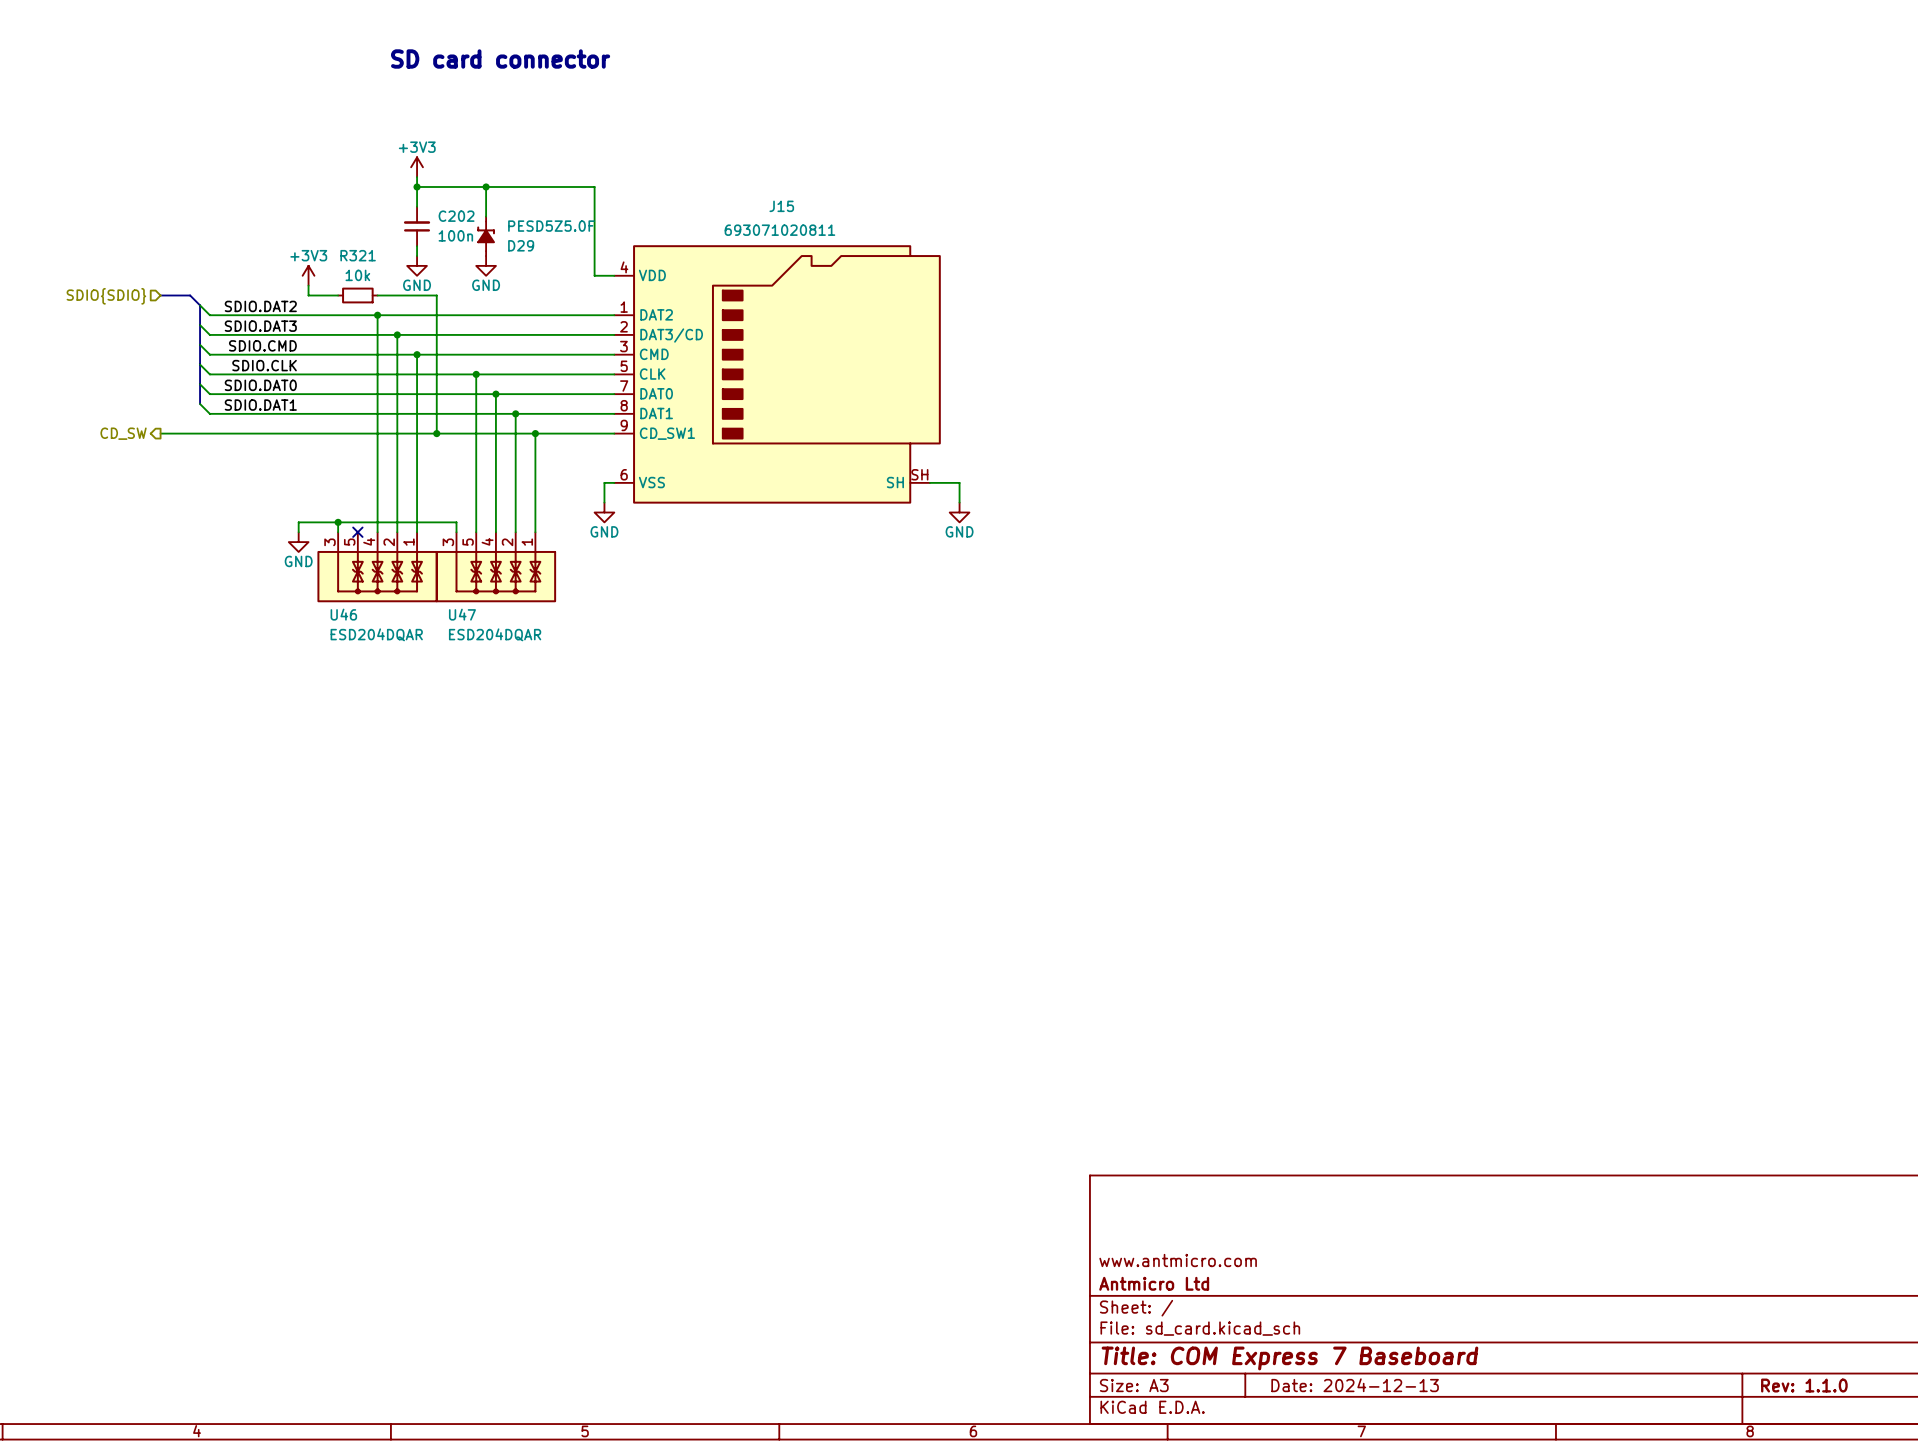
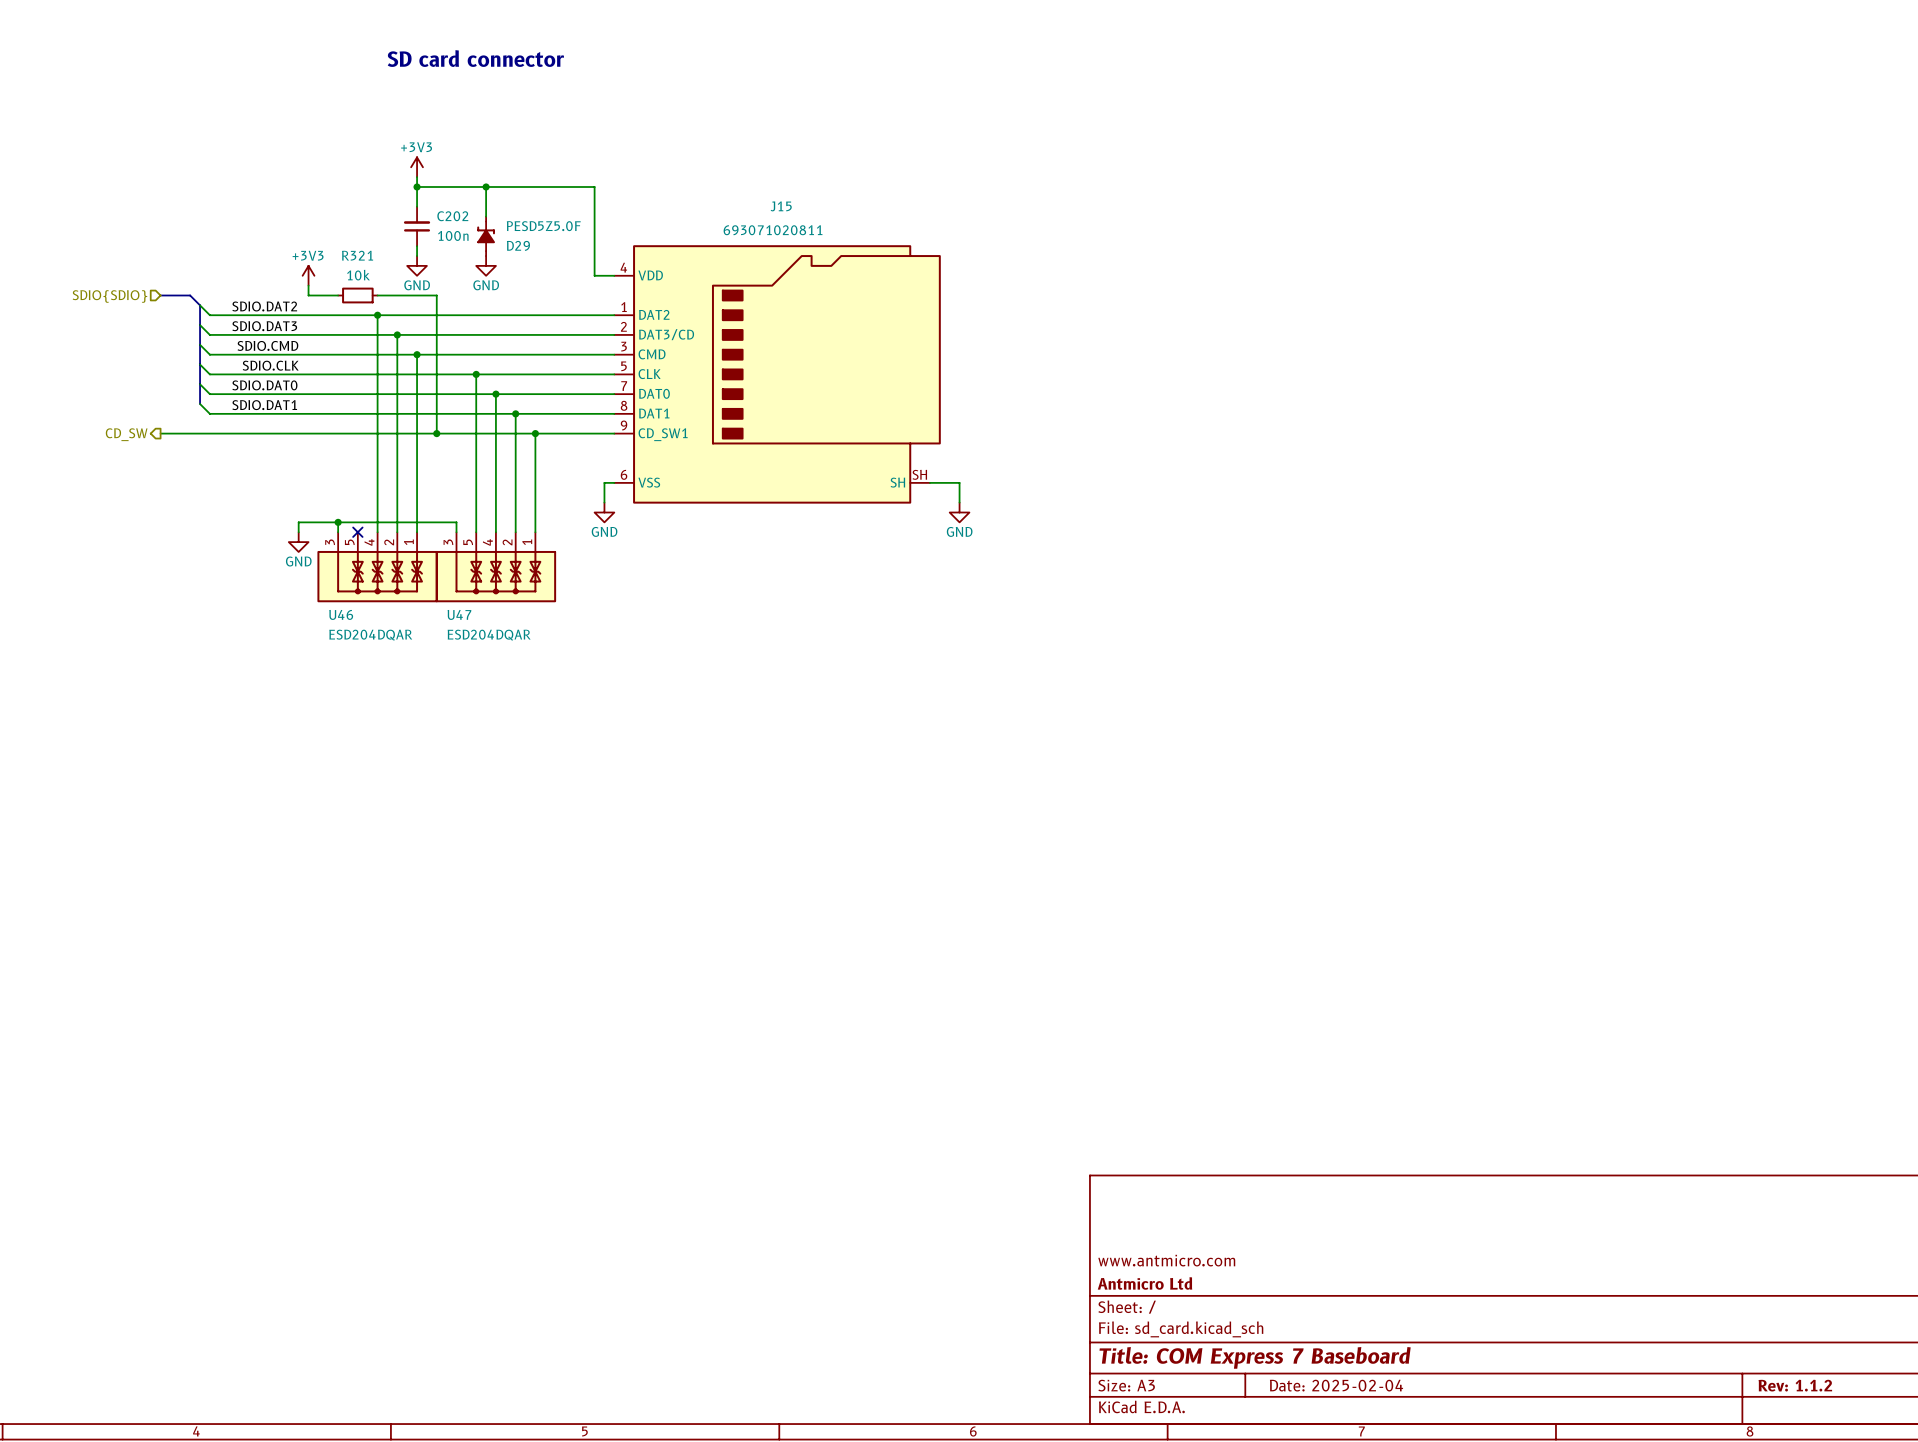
title block: Date: 2024-12-13 (1355, 1385) -> Date: 2025-02-04 (1336, 1385)
title block: Rev: 1.1.0 (1804, 1385) -> Rev: 1.1.2 (1795, 1385)

